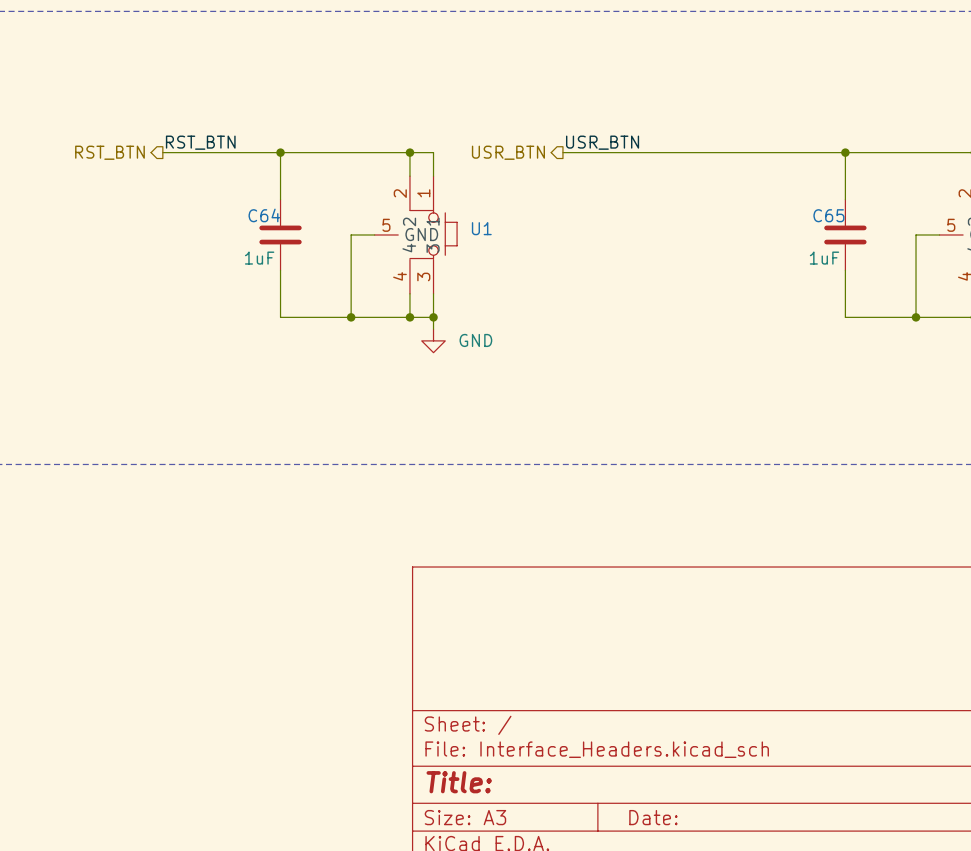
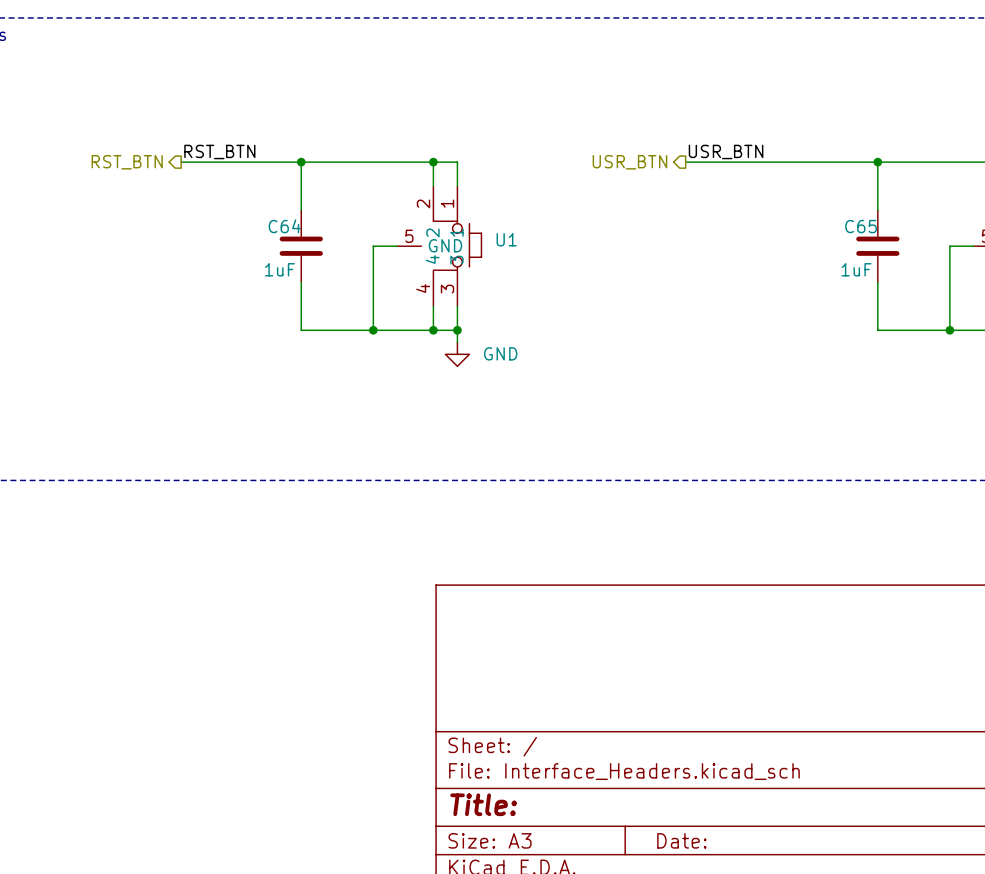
label position: USR_BTN (602, 142) -> USR_BTN (726, 151)
hierarchical label position: USR_BTN (508, 152) -> USR_BTN (629, 162)
wire: (562, 152) (657, 152) -> none

